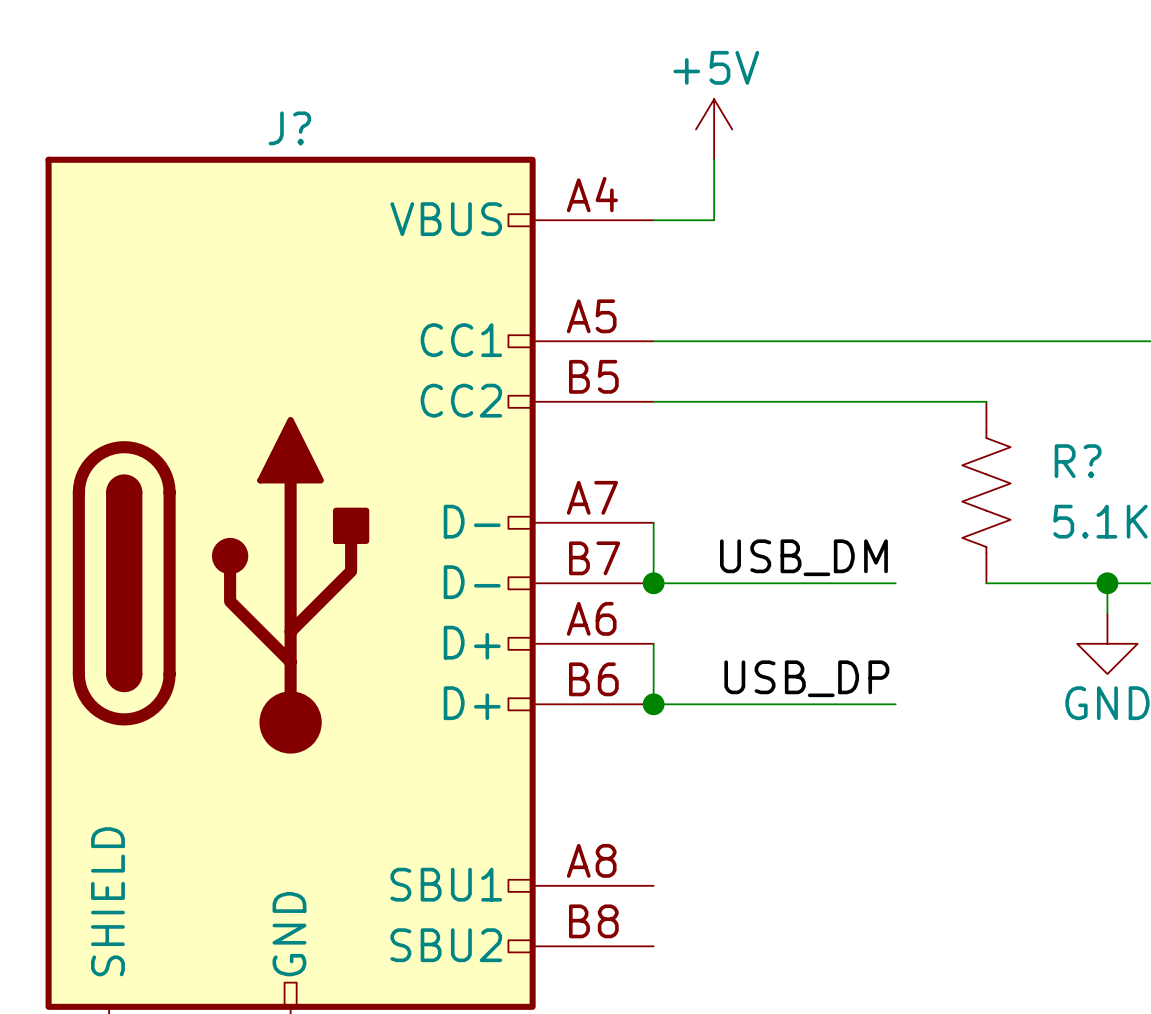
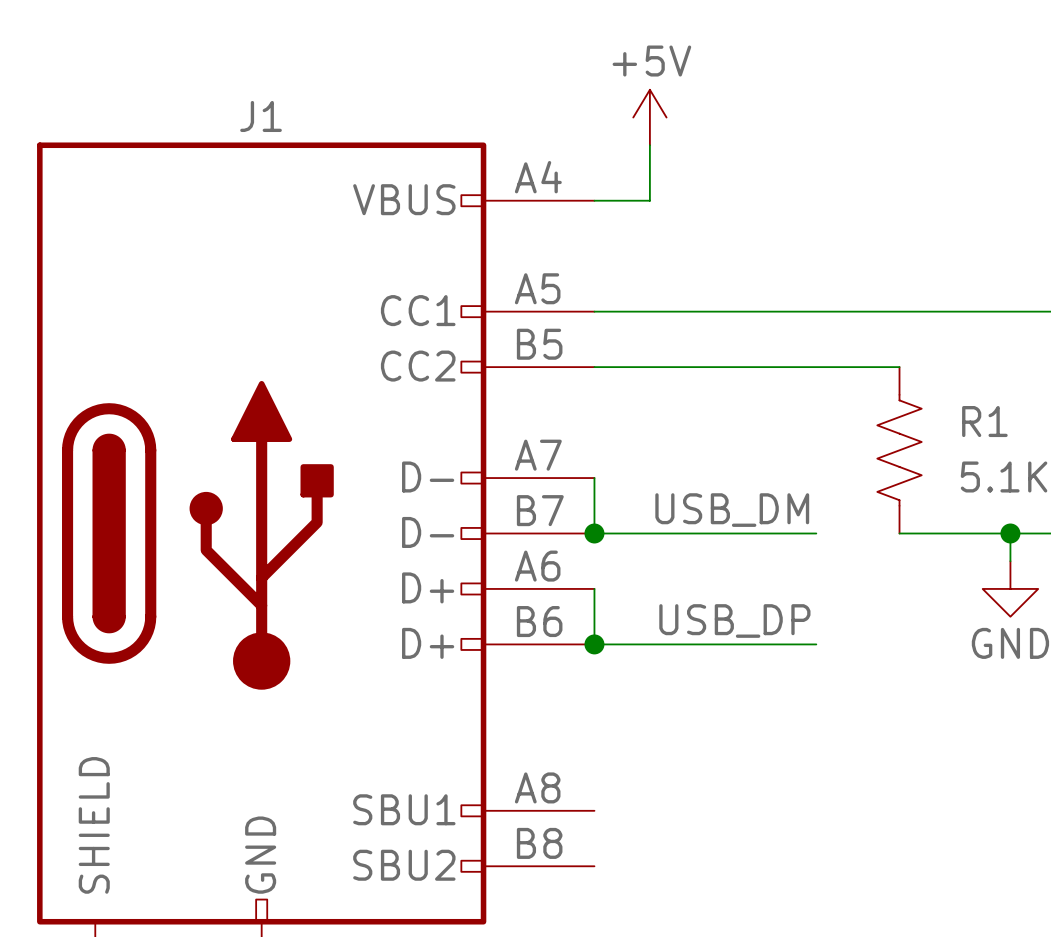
J? name: J? (289, 128) -> J1 (261, 116)
R? name: R? (1078, 461) -> R1 (984, 421)

